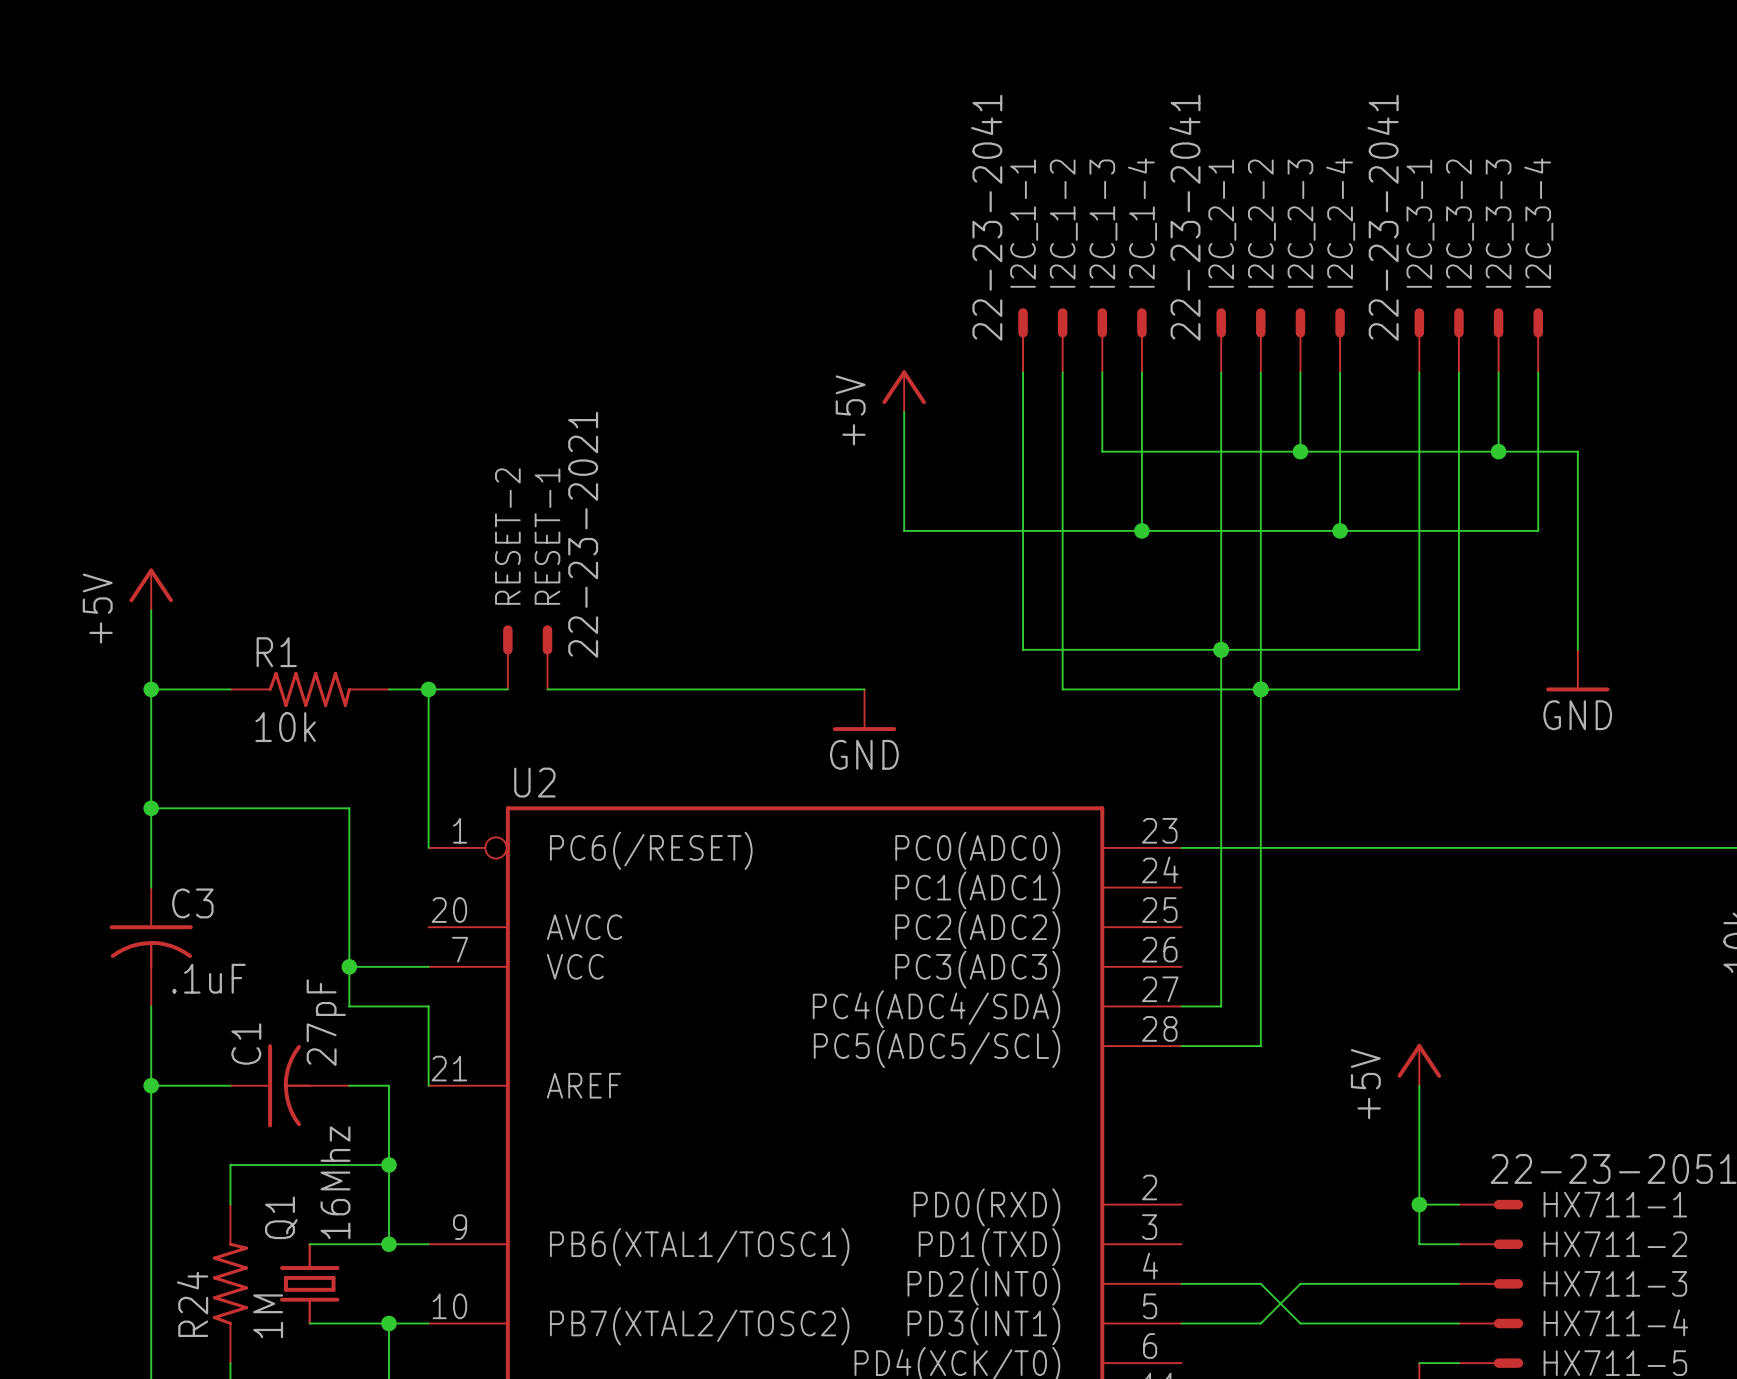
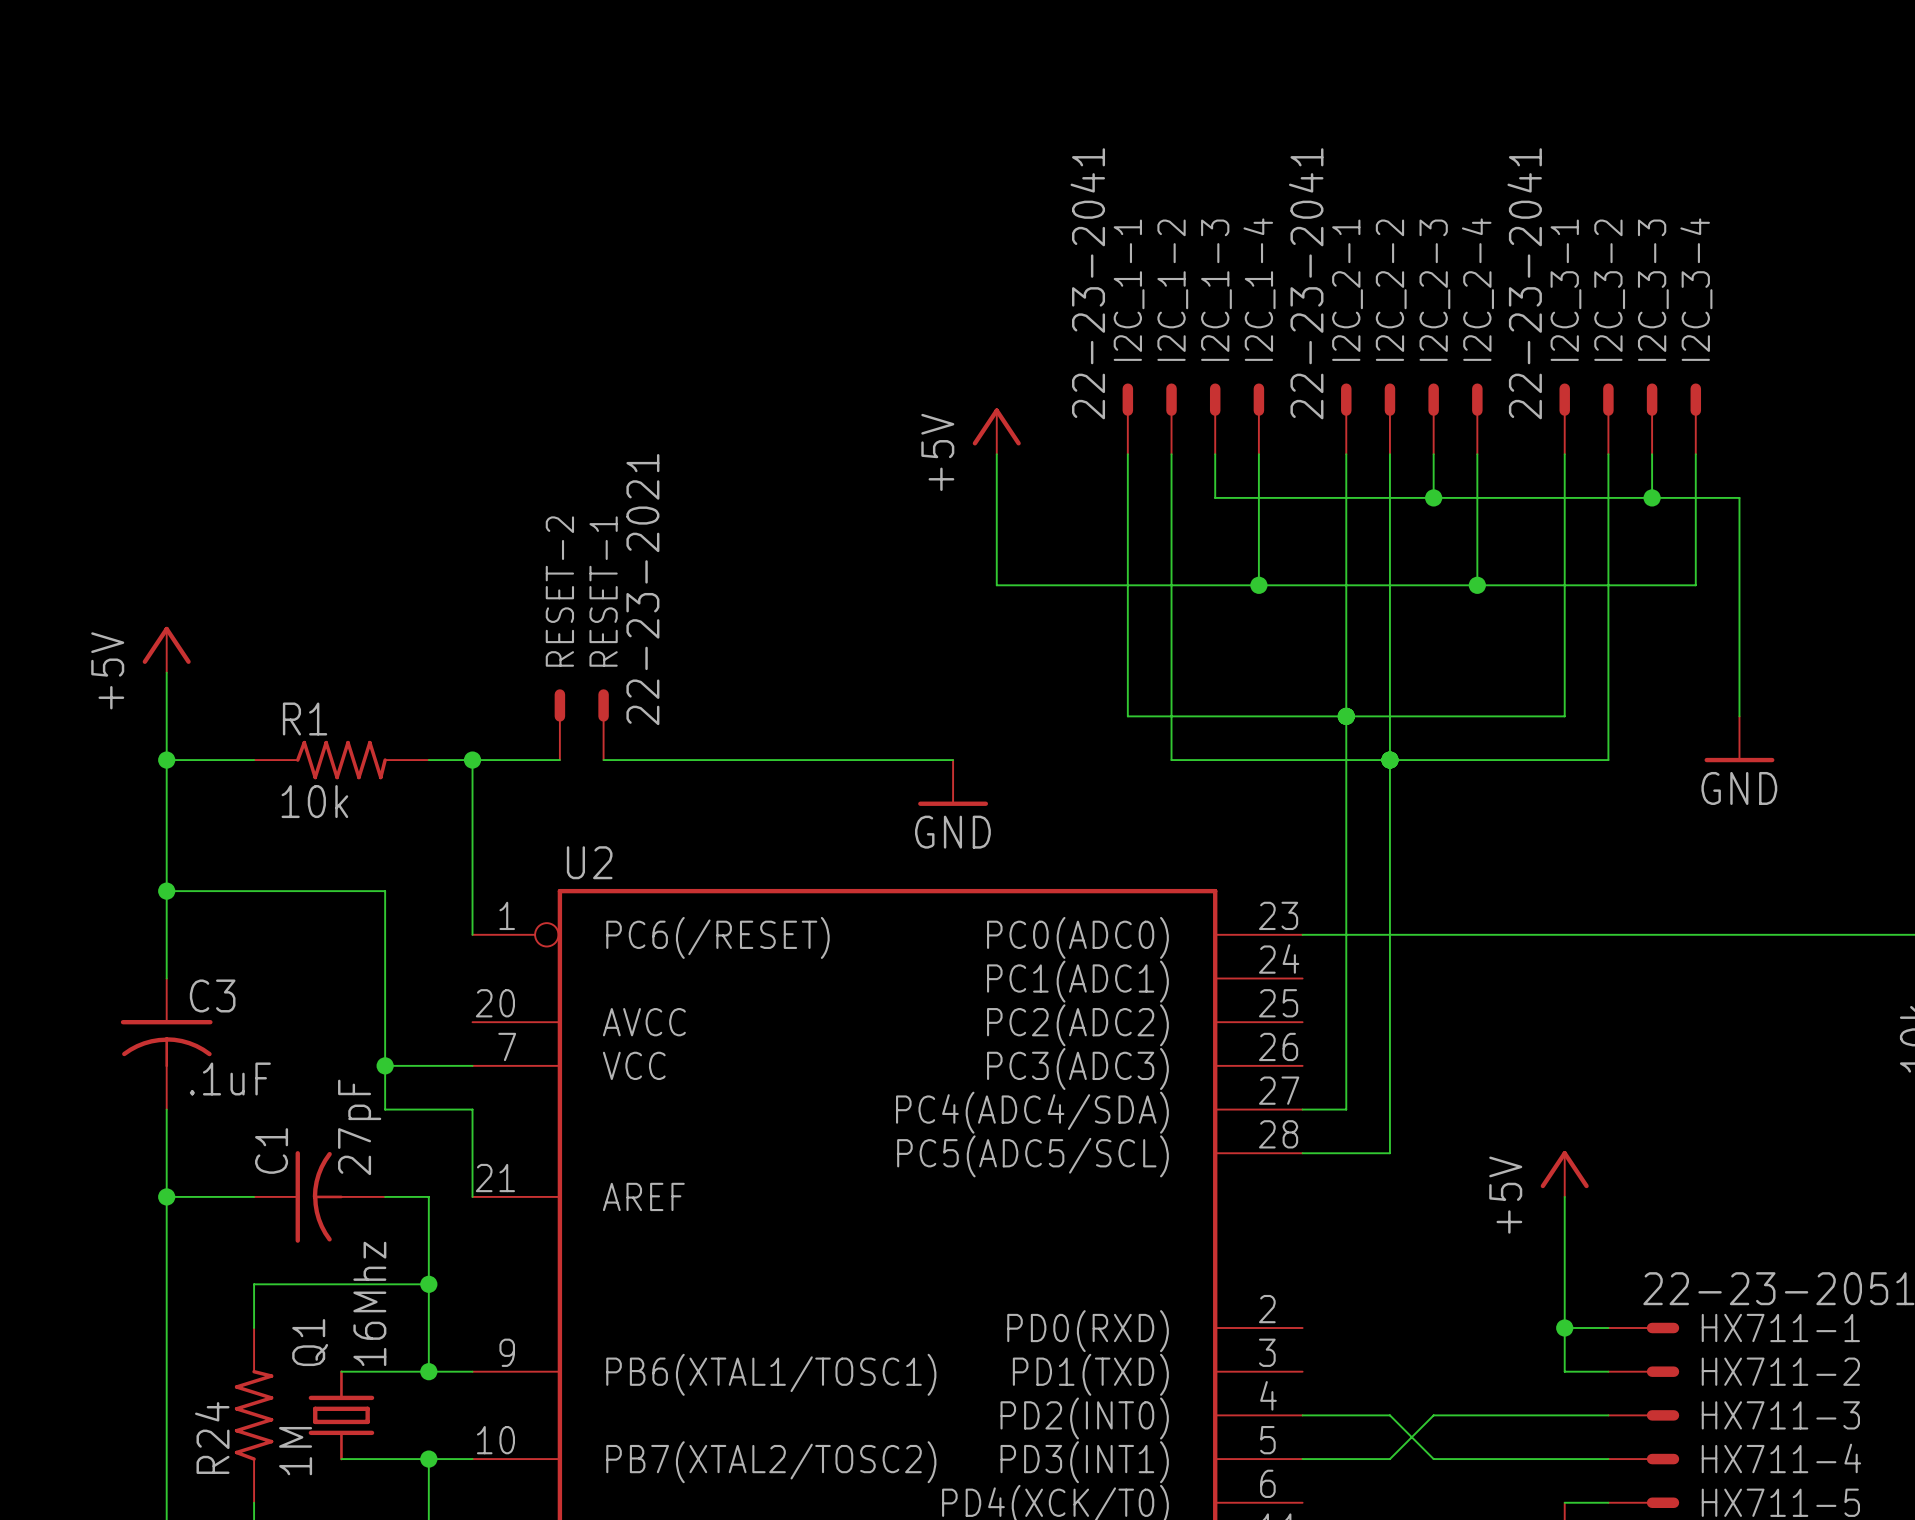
I2C_1-1 position: (1023, 340) -> (1127, 418)
I2C_1-2 position: (1062, 340) -> (1171, 418)
I2C_1-3 position: (1102, 340) -> (1215, 418)
I2C_1-4 position: (1141, 340) -> (1258, 418)
I2C_2-1 position: (1221, 340) -> (1346, 418)
I2C_2-2 position: (1260, 340) -> (1389, 418)
I2C_2-3 position: (1300, 340) -> (1433, 418)
I2C_2-4 position: (1340, 340) -> (1477, 418)
I2C_3-1 position: (1419, 340) -> (1564, 418)
I2C_3-2 position: (1458, 340) -> (1608, 418)
I2C_3-3 position: (1498, 340) -> (1652, 418)
I2C_3-4 position: (1538, 340) -> (1695, 418)

